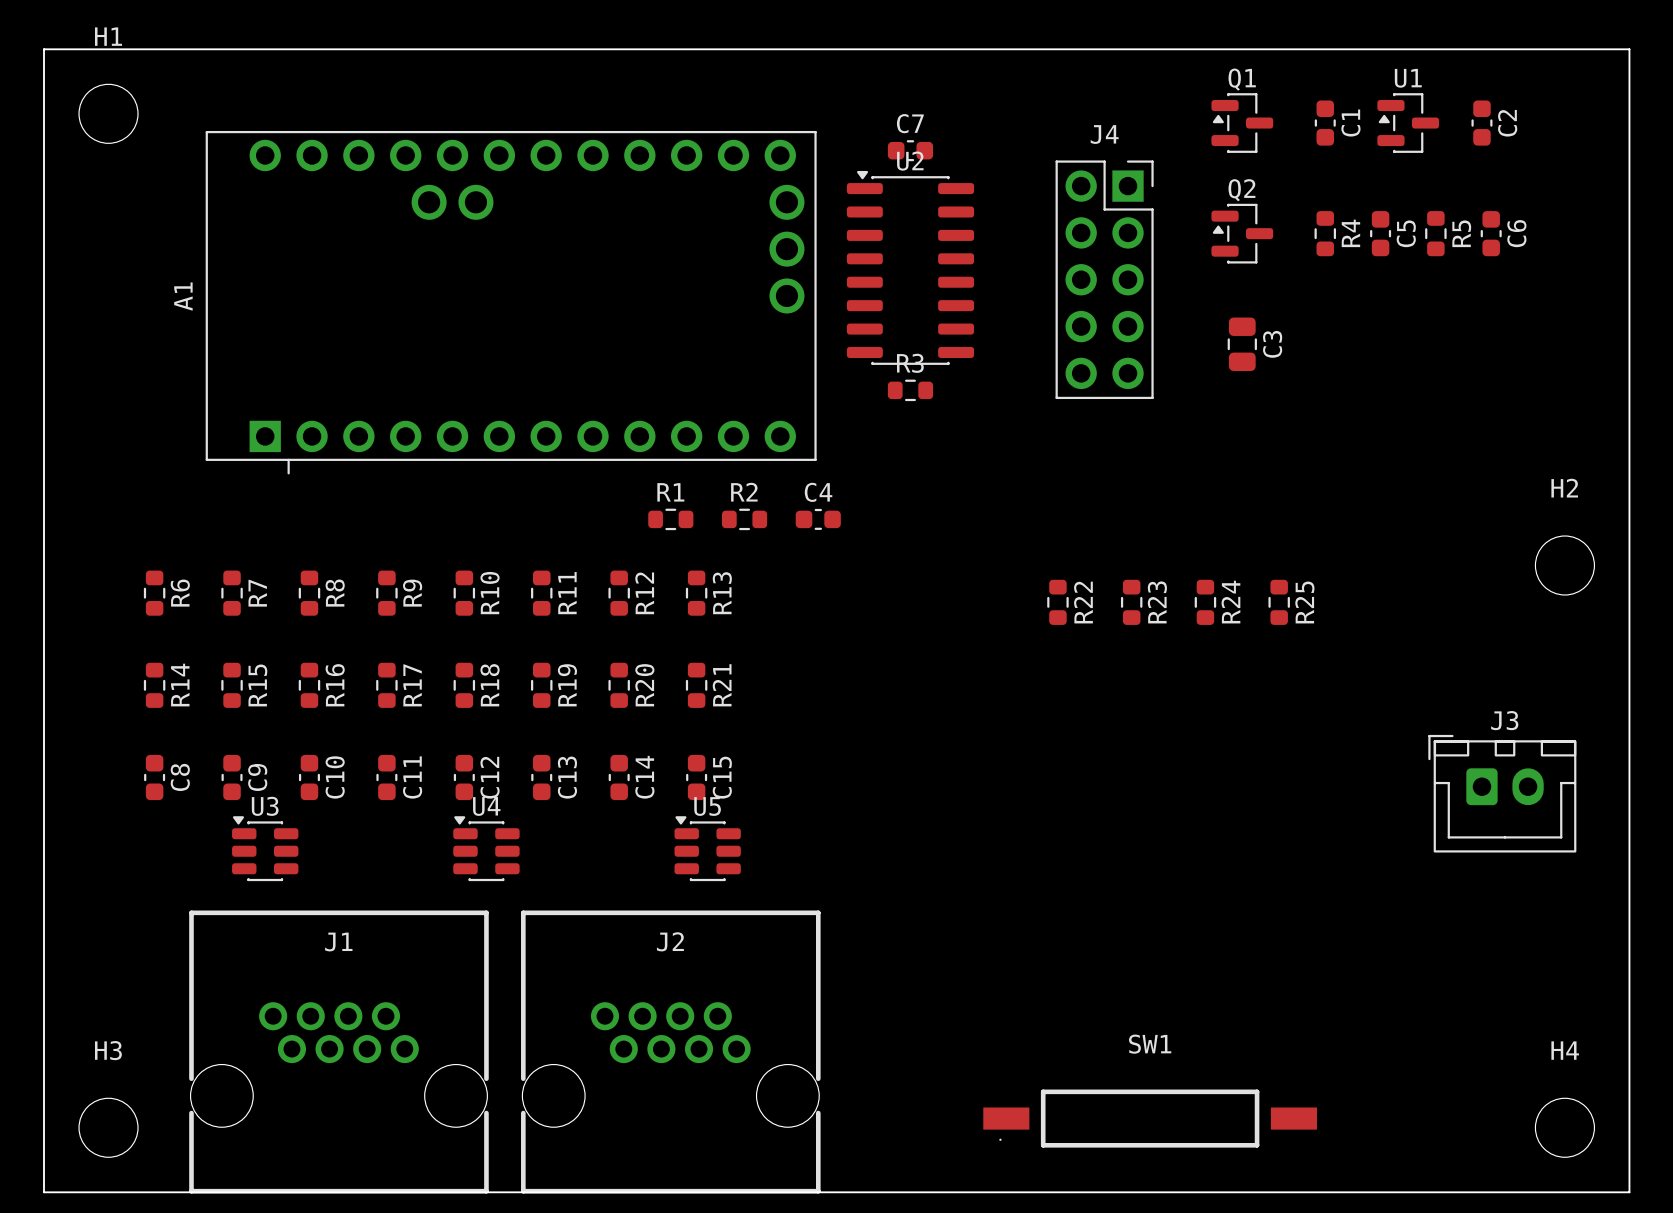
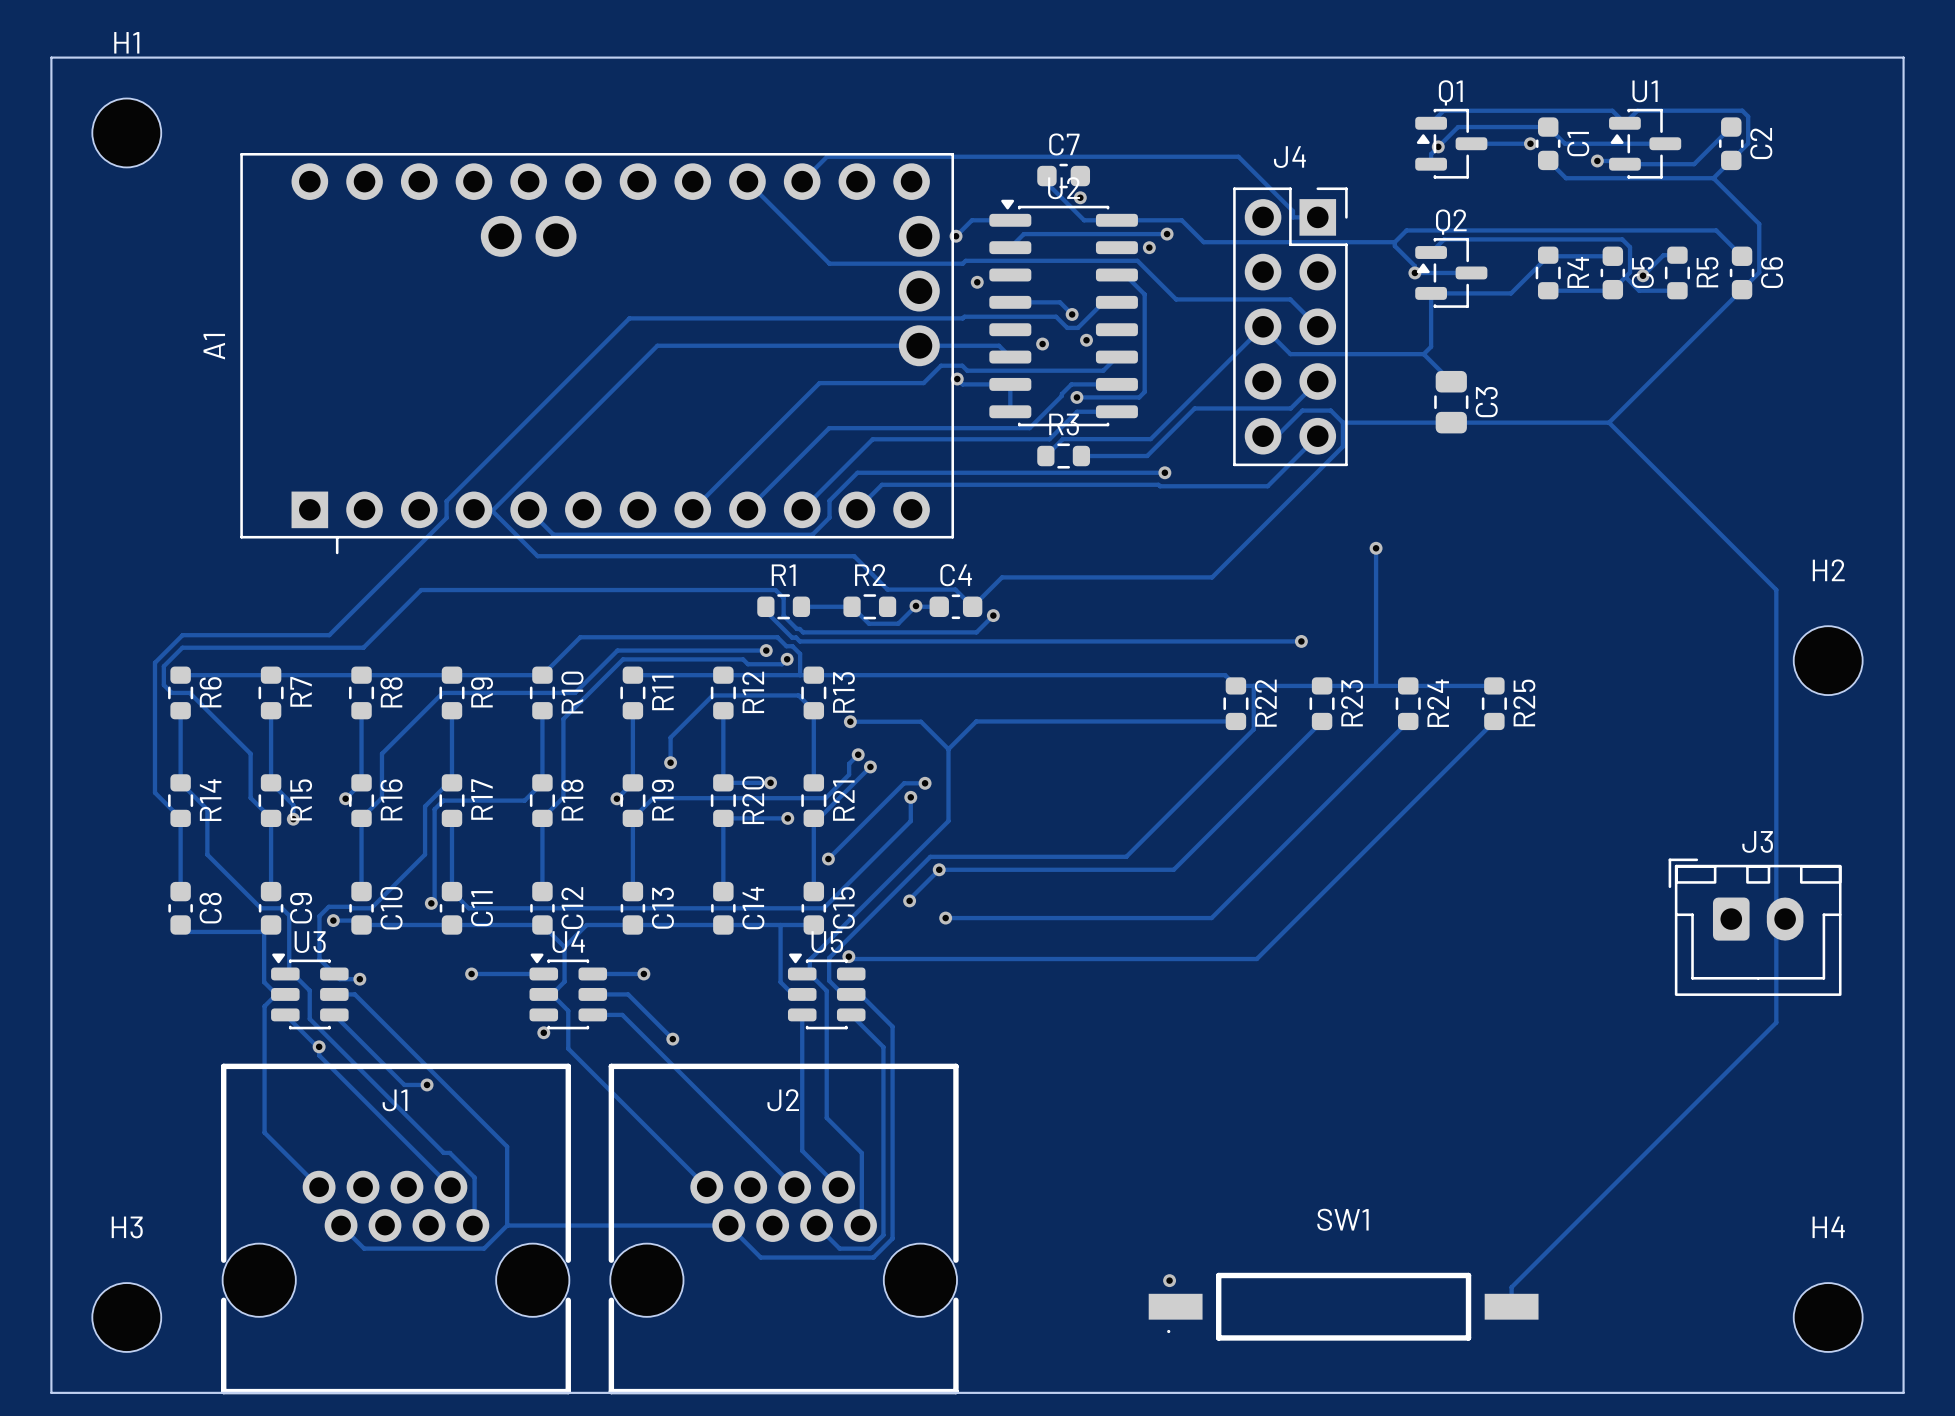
track: none -> (1431, 123) (1443, 110) (1612, 110) (1624, 123) (1637, 110) (1742, 110) (1748, 116) (1748, 143) (1713, 178)
track: none -> (1731, 127) (1694, 164) (1624, 164) (1621, 160) (1597, 160)
track: none -> (1471, 143) (1530, 143)
via: none -> (1530, 143)
track: none -> (1665, 143) (1564, 143) (1548, 127) (1458, 127) (1431, 154) (1431, 164)
via: none -> (1438, 146)
track: none -> (1548, 160) (1566, 178) (1713, 178)
via: none -> (1597, 160)
track: none -> (1046, 176) (1046, 183) (1084, 220) (1181, 220) (1203, 242) (1394, 242)
track: none -> (1713, 178) (1759, 223) (1759, 272) (1609, 422)
track: none -> (747, 181) (829, 263) (962, 263) (965, 260) (1137, 260) (1176, 299) (1290, 299) (1317, 326)
track: none -> (802, 181) (827, 156) (1238, 156) (1292, 211) (1292, 217) (1317, 217)
via: none -> (1080, 197)
track: none -> (1010, 220) (971, 220) (956, 236)
track: none -> (1167, 234) (1023, 234) (1010, 247)
via: none -> (1167, 234)
via: none -> (956, 236)
track: none -> (1394, 242) (1406, 230) (1716, 230) (1742, 256)
track: none -> (1394, 242) (1394, 246) (1414, 266) (1414, 272) (1471, 272)
via: none -> (1149, 247)
track: none -> (1431, 252) (1444, 239) (1622, 239) (1630, 247) (1630, 272) (1611, 290) (1548, 290)
track: none -> (1677, 255) (1663, 255) (1643, 275)
track: none -> (1548, 256) (1511, 293) (1431, 293) (1431, 346) (1423, 354)
track: none -> (1548, 256) (1612, 256)
via: none -> (1414, 272)
track: none -> (1116, 275) (1125, 275) (1144, 294) (1144, 391) (1139, 397) (1076, 397)
via: none -> (1643, 275)
track: none -> (1625, 277) (1639, 290) (1677, 290)
via: none -> (977, 282)
track: none -> (1010, 302) (1060, 302) (1072, 314)
track: none -> (1116, 302) (1103, 302) (1077, 327) (1067, 327) (1056, 316) (629, 318) (446, 501) (446, 517) (329, 635) (182, 635) (154, 662) (154, 792) (180, 818) (180, 891)
via: none -> (1072, 314)
via: none -> (1086, 340)
via: none -> (1042, 344)
track: none -> (1423, 354) (1290, 354) (1263, 326) (1150, 439) (1062, 439) (1045, 456)
track: none -> (1423, 354) (1451, 381)
track: none -> (1010, 357) (999, 345) (657, 345) (492, 510)
track: none -> (1116, 357) (1103, 370) (967, 370) (962, 365) (941, 365) (923, 383) (819, 383) (692, 509)
track: none -> (957, 379) (962, 384) (1010, 384) (1010, 411)
via: none -> (957, 379)
track: none -> (1317, 381) (1290, 408) (1194, 408) (1147, 456) (1081, 456)
track: none -> (1116, 384) (1071, 384) (1029, 428) (829, 428) (747, 509)
via: none -> (1076, 397)
track: none -> (1116, 411) (1077, 411) (1049, 439) (872, 439) (802, 509)
track: none -> (1342, 422) (1609, 422)
track: none -> (1342, 422) (1342, 446) (1212, 577) (1002, 577) (972, 606) (955, 589) (887, 589) (854, 556) (537, 556) (491, 509) (473, 509)
track: none -> (1342, 422) (1330, 410) (1302, 410) (1276, 436) (1263, 436)
track: none -> (1609, 422) (1776, 589) (1776, 1022) (1511, 1287) (1511, 1306)
track: none -> (1317, 436) (1267, 486) (881, 484) (856, 509)
track: none -> (1164, 472) (857, 472) (829, 500) (829, 517) (812, 534) (553, 534) (528, 509)
via: none -> (1164, 472)
track: none -> (1376, 548) (1376, 685)
via: none -> (1376, 548)
via: none -> (915, 605)
track: none -> (765, 606) (765, 611) (792, 637) (796, 637) (799, 641) (1301, 641)
track: none -> (801, 606) (852, 606) (868, 623) (898, 623) (915, 605) (939, 606)
track: none -> (993, 615) (976, 632) (803, 632) (783, 615) (783, 598) (775, 590) (421, 590) (363, 647) (182, 647) (163, 666) (163, 685) (171, 692) (189, 692) (250, 753) (250, 797) (271, 818) (271, 891)
via: none -> (993, 615)
via: none -> (1301, 641)
track: none -> (766, 650) (617, 650) (575, 692) (442, 692) (381, 753) (381, 797) (361, 818) (361, 891)
via: none -> (766, 650)
track: none -> (787, 659) (782, 664) (747, 664) (743, 659) (623, 659) (563, 719) (563, 797) (542, 818) (542, 891)
via: none -> (787, 659)
track: none -> (180, 675) (542, 675) (580, 637) (777, 637) (786, 646) (792, 646) (800, 653) (800, 675)
track: none -> (632, 675) (1225, 675) (1235, 685) (1494, 685)
track: none -> (1253, 685) (1253, 729) (1126, 856) (930, 856) (829, 957) (829, 980) (842, 994) (860, 994) (892, 1026) (892, 1238) (873, 1257) (760, 1257) (728, 1225) (507, 1225)
track: none -> (180, 710) (180, 782) (207, 809) (207, 854) (260, 908) (282, 908) (289, 915) (289, 970)
track: none -> (271, 710) (271, 782) (293, 805) (293, 819)
track: none -> (361, 710) (361, 782) (345, 798)
track: none -> (451, 710) (451, 782) (448, 782) (425, 806) (425, 854) (371, 908) (328, 906) (319, 916) (319, 959) (339, 979) (359, 979)
track: none -> (542, 710) (542, 782) (524, 800) (443, 800) (434, 809) (434, 900) (431, 903)
track: none -> (632, 710) (632, 782) (616, 798)
track: none -> (723, 710) (723, 782) (770, 782)
track: none -> (850, 721) (921, 721) (948, 749)
via: none -> (850, 721)
track: none -> (1235, 721) (976, 721) (948, 749)
track: none -> (1322, 721) (1173, 869) (939, 869) (909, 900)
track: none -> (1408, 721) (1211, 918) (945, 918)
track: none -> (1494, 721) (1256, 959) (851, 959) (848, 956)
track: none -> (948, 749) (948, 821) (809, 959) (809, 973)
track: none -> (858, 754) (849, 763) (849, 774) (825, 798) (653, 798) (632, 818) (632, 891)
via: none -> (858, 754)
track: none -> (670, 762) (670, 737) (712, 695) (798, 695) (813, 710) (813, 782)
via: none -> (670, 762)
track: none -> (870, 766) (819, 818) (813, 818) (813, 891)
via: none -> (870, 766)
via: none -> (770, 782)
track: none -> (925, 783) (904, 783) (828, 859)
via: none -> (925, 783)
track: none -> (910, 797) (910, 821) (823, 908) (468, 908) (451, 891) (451, 818)
via: none -> (910, 797)
via: none -> (345, 798)
via: none -> (616, 798)
track: none -> (787, 818) (723, 818) (723, 891)
via: none -> (787, 818)
via: none -> (293, 819)
via: none -> (828, 859)
via: none -> (939, 869)
via: none -> (909, 900)
via: none -> (431, 903)
via: none -> (945, 918)
track: none -> (333, 920) (357, 920) (361, 924) (542, 924) (564, 947)
via: none -> (333, 920)
track: none -> (180, 924) (187, 931) (264, 931)
track: none -> (780, 924) (780, 982) (792, 994) (802, 994)
track: none -> (813, 924) (586, 924) (564, 947)
track: none -> (264, 931) (264, 982) (276, 994)
track: none -> (564, 947) (564, 981) (551, 994)
via: none -> (848, 956)
track: none -> (289, 970) (309, 990) (309, 1018) (443, 1152) (449, 1152) (474, 1177) (474, 1223) (472, 1225)
track: none -> (471, 973) (543, 973)
via: none -> (471, 973)
track: none -> (592, 973) (643, 973)
via: none -> (643, 973)
track: none -> (809, 973) (826, 990) (826, 1117) (861, 1153) (860, 1225)
via: none -> (359, 979)
track: none -> (276, 994) (264, 1006) (264, 1132) (319, 1187)
track: none -> (334, 994) (354, 994) (507, 1146) (507, 1225)
track: none -> (551, 994) (568, 1010) (568, 1048) (706, 1187)
track: none -> (592, 994) (628, 994) (672, 1039)
track: none -> (285, 1014) (319, 1046) (319, 1055) (450, 1187)
track: none -> (334, 1014) (404, 1084) (427, 1084)
track: none -> (592, 1014) (622, 1014) (794, 1187)
track: none -> (802, 1014) (802, 1150) (838, 1187)
track: none -> (851, 1014) (883, 1047) (883, 1235) (870, 1248) (839, 1248) (816, 1225)
via: none -> (543, 1032)
via: none -> (672, 1039)
via: none -> (319, 1046)
via: none -> (427, 1084)
track: none -> (341, 1225) (364, 1248) (484, 1248) (507, 1225)
via: none -> (1169, 1280)

